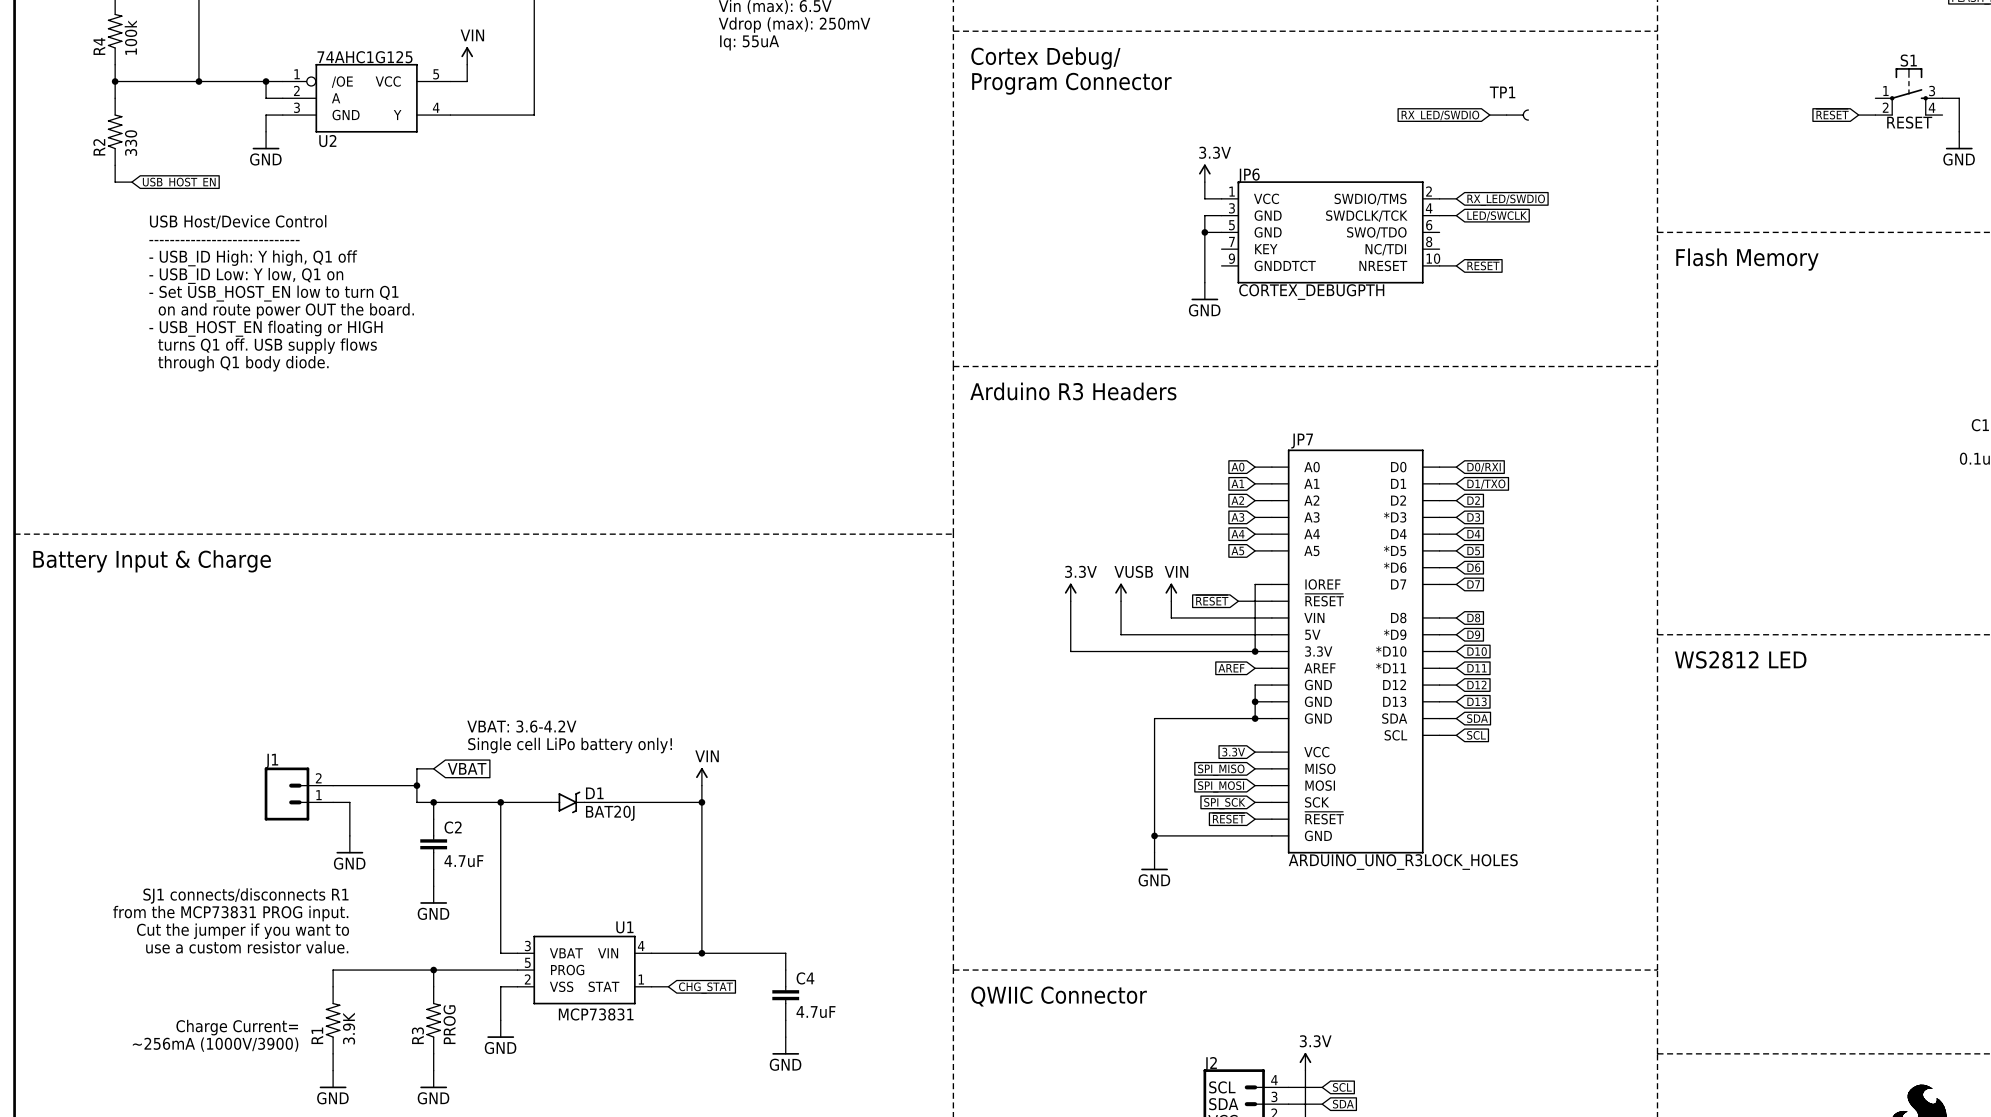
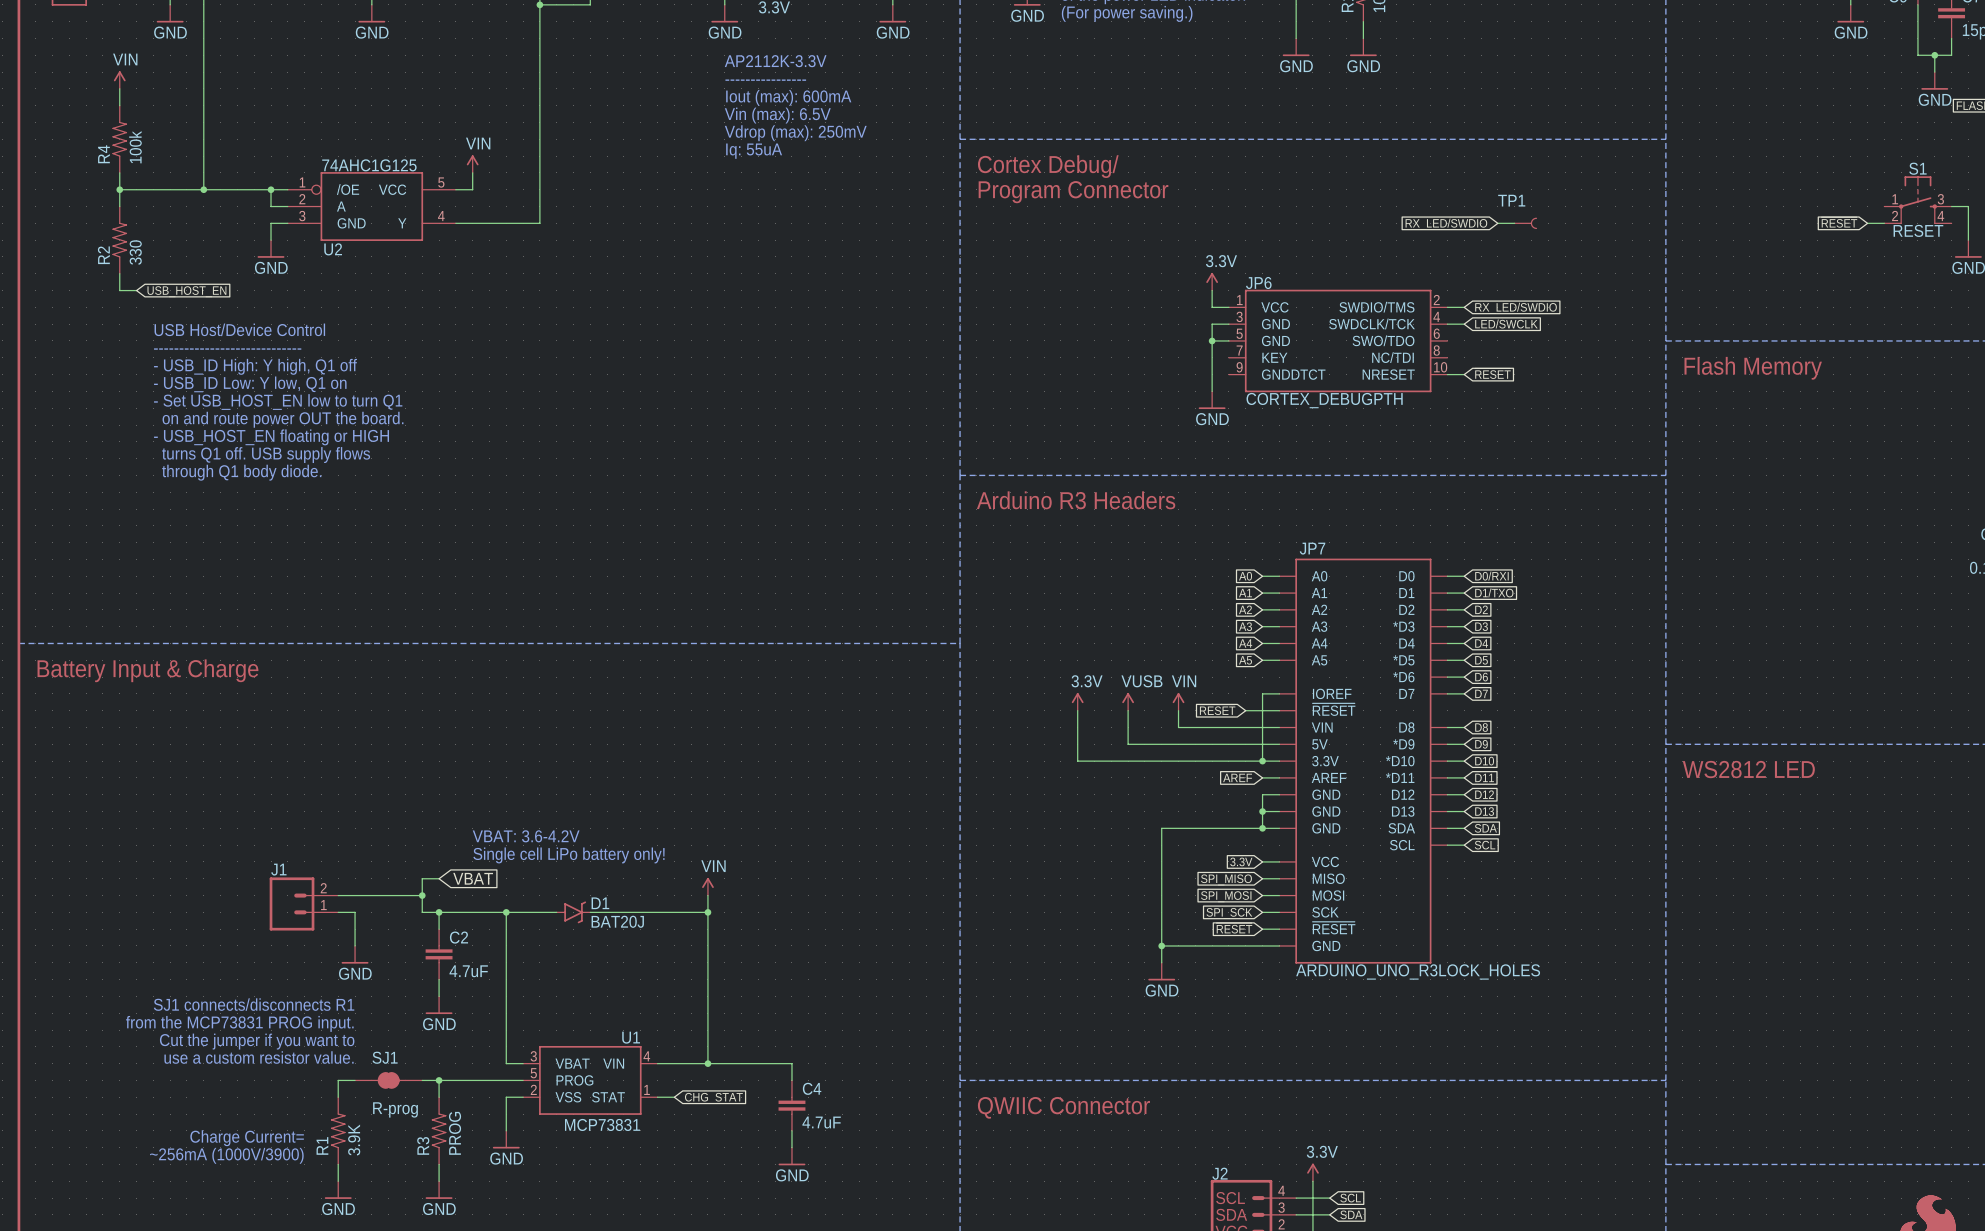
SJ1: none -> R-prog (388, 1080)

